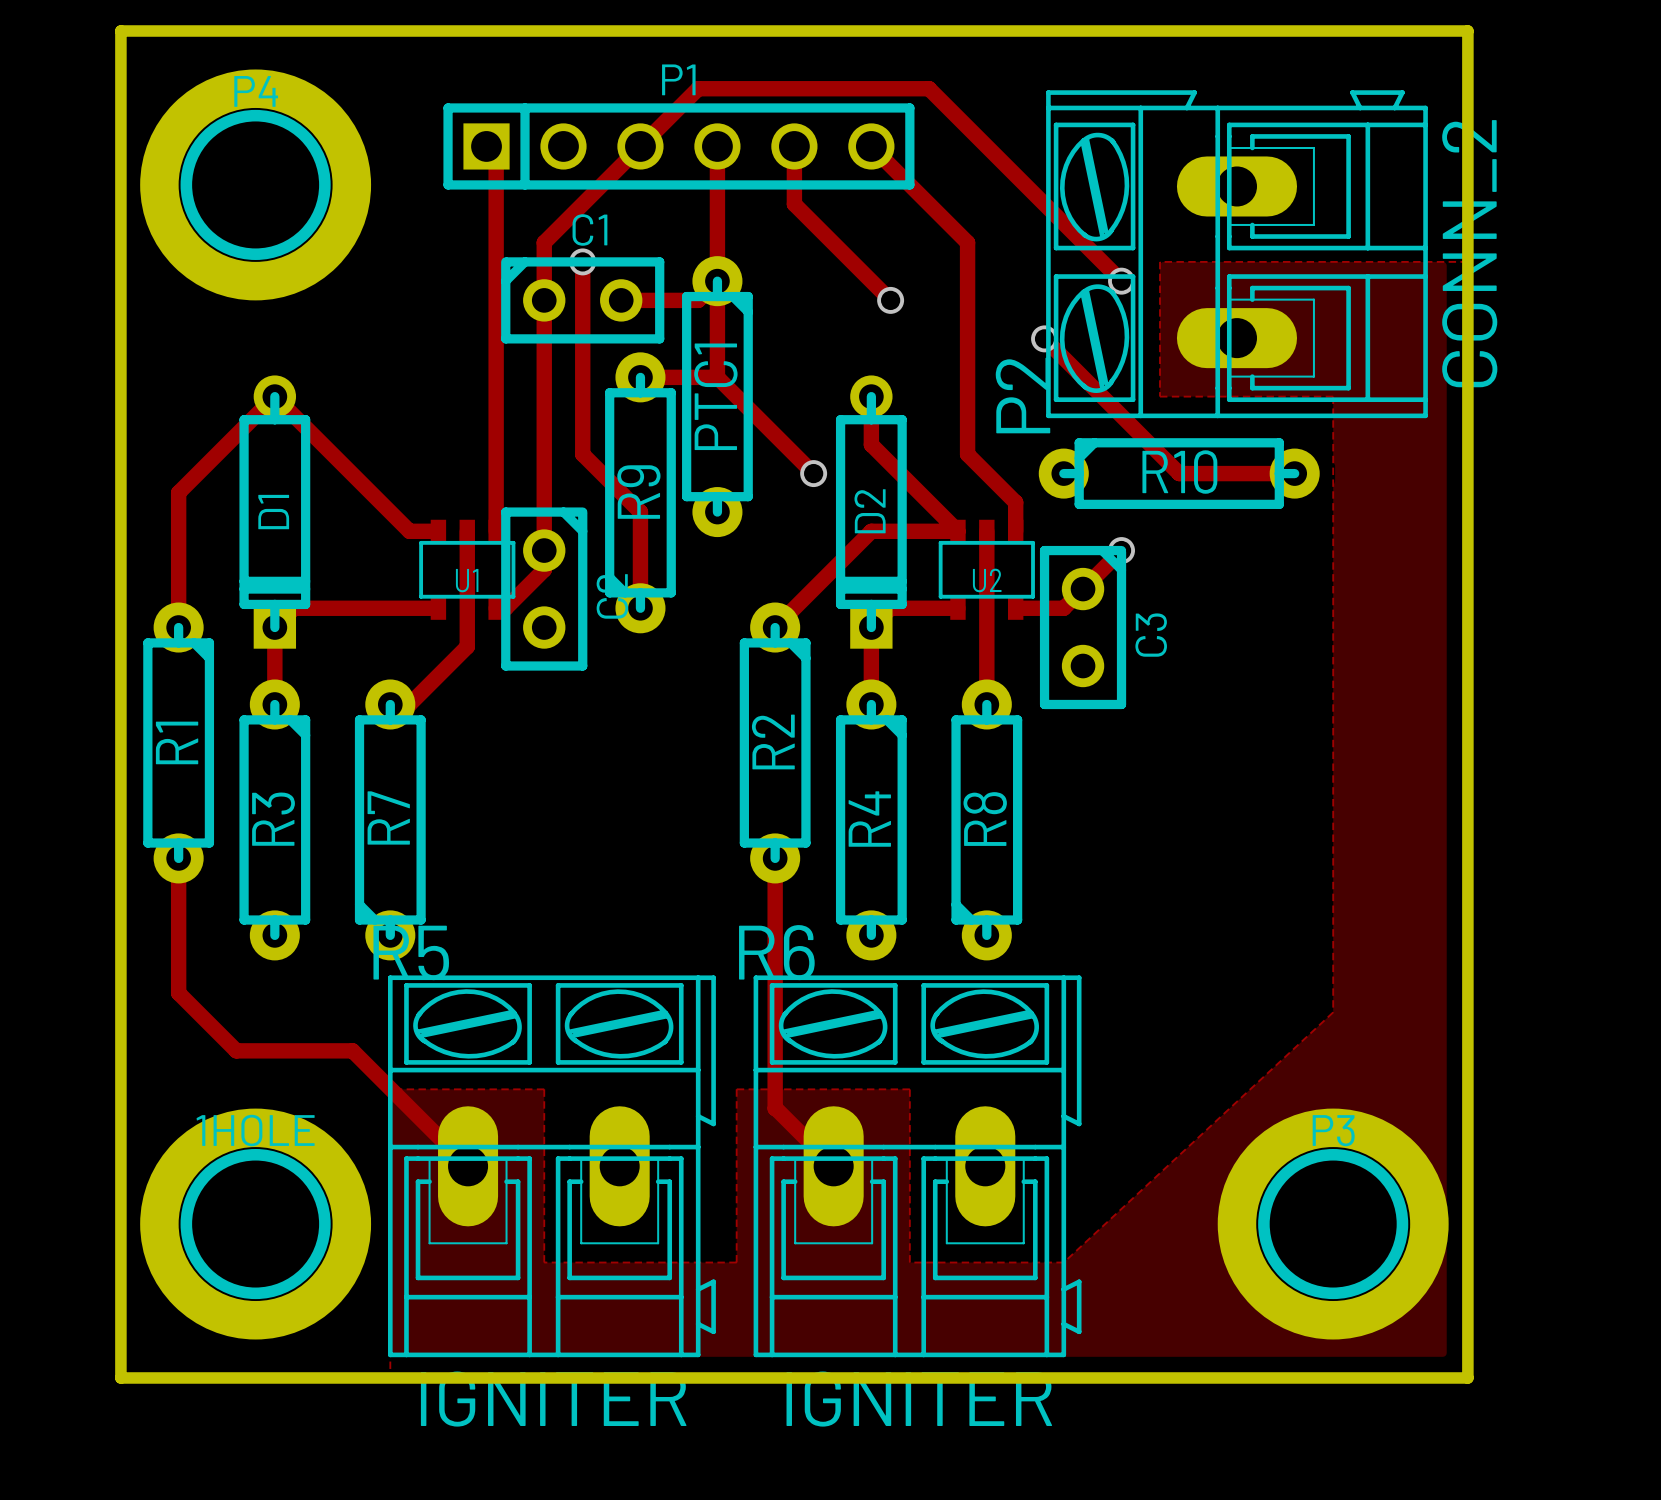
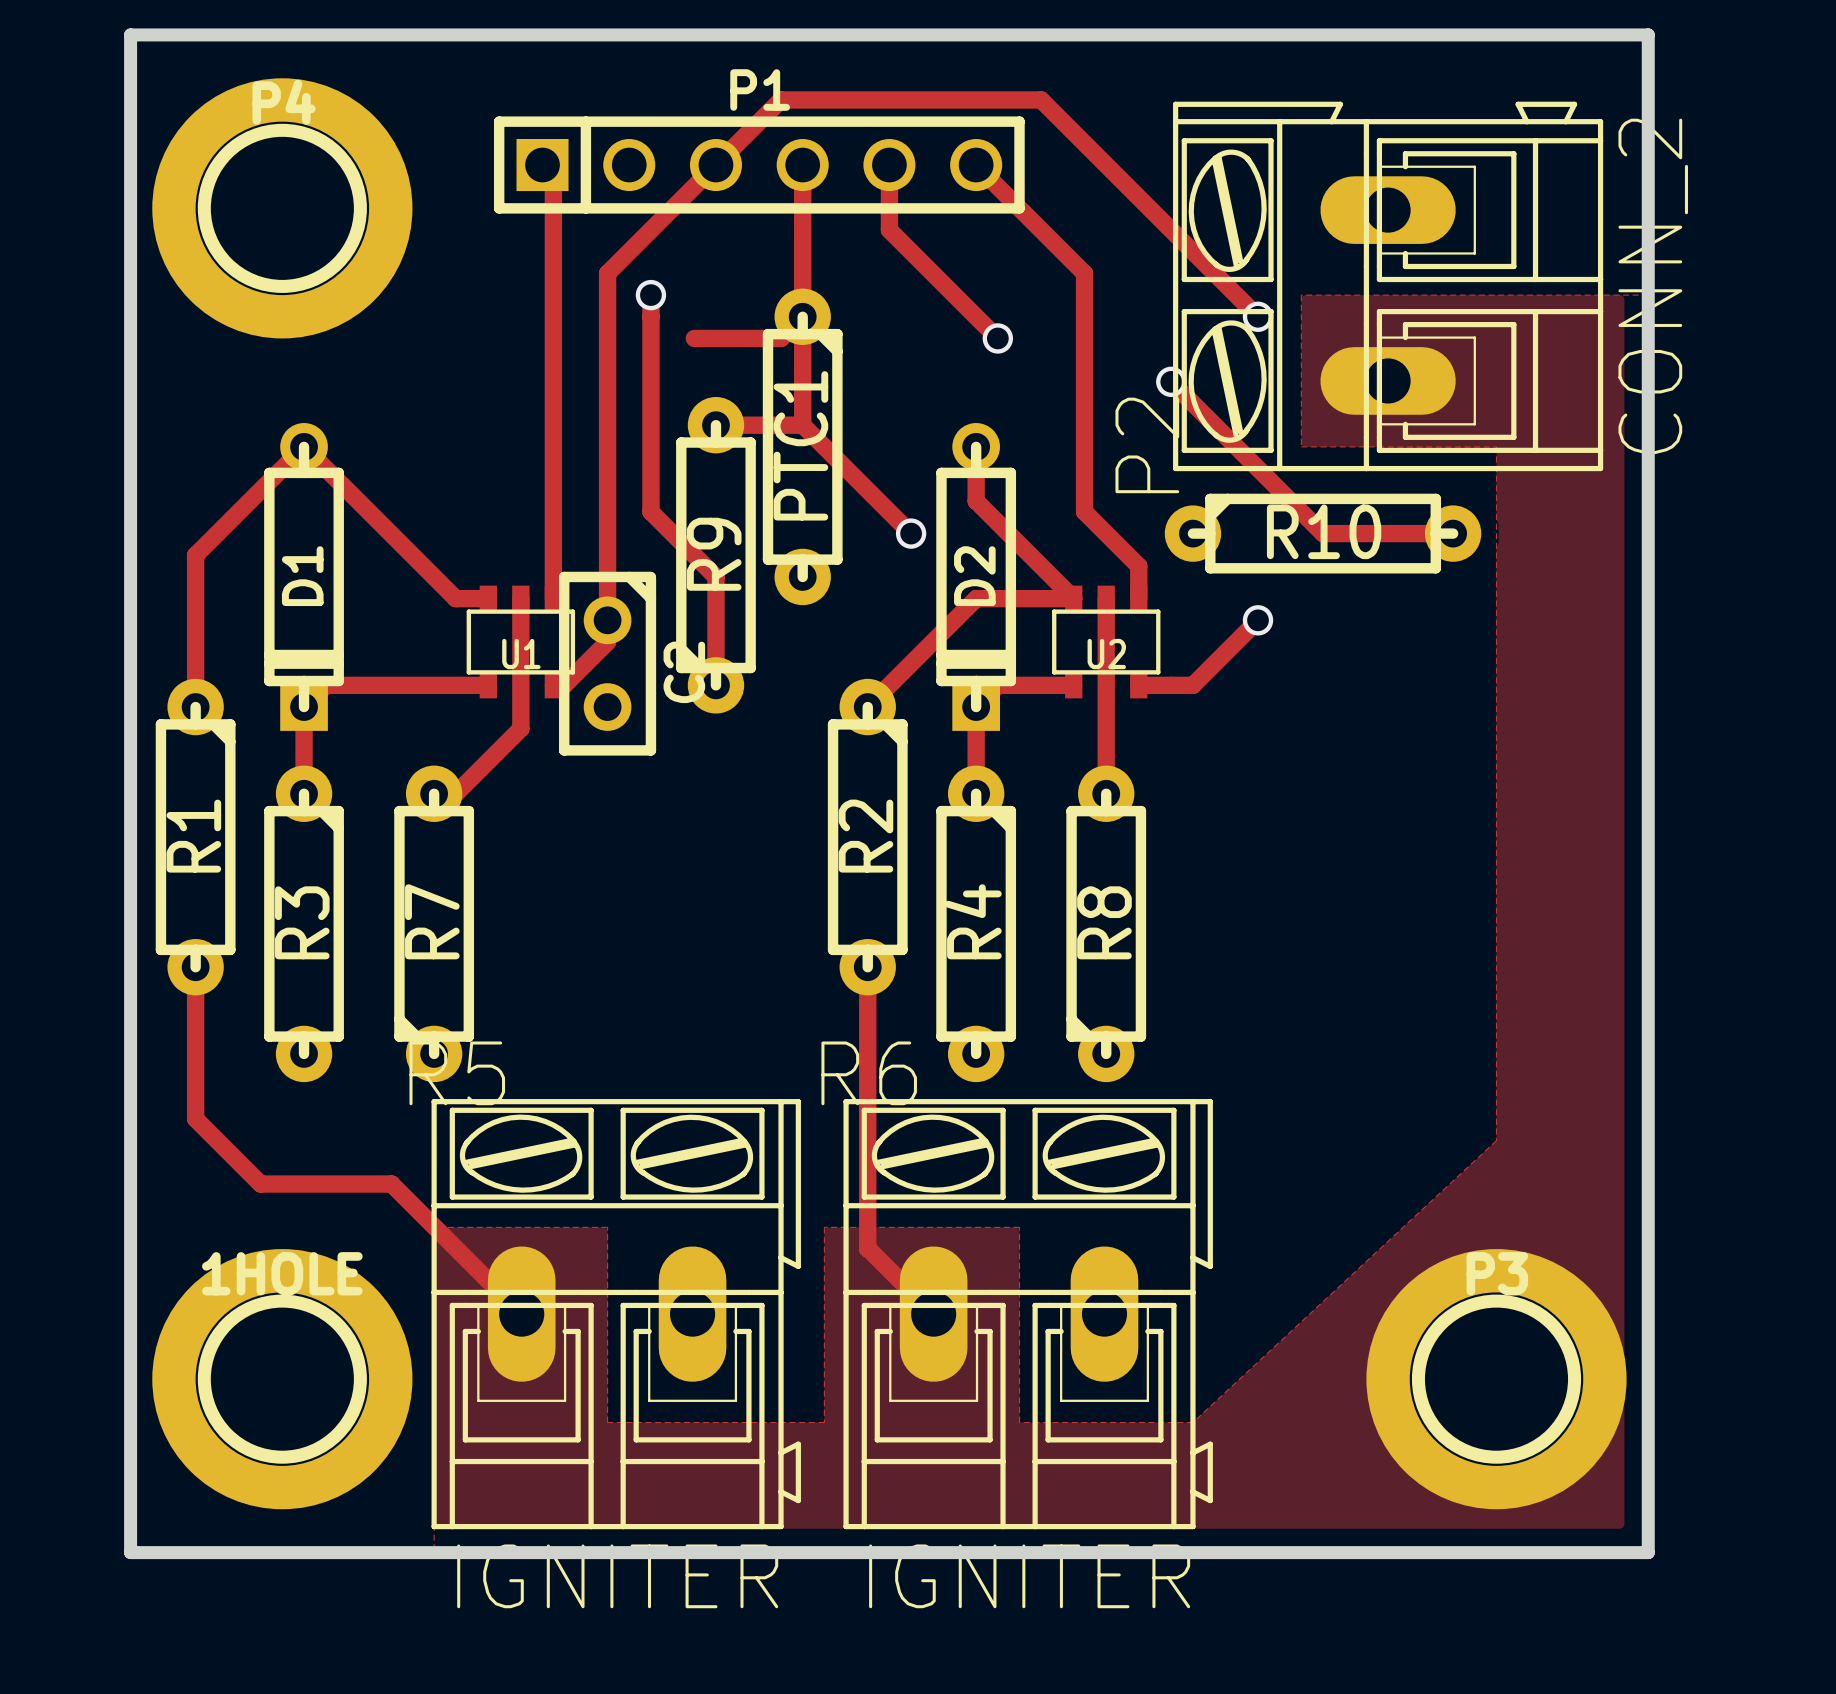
C1: (582, 300) -> none
C3: (1083, 627) -> none

